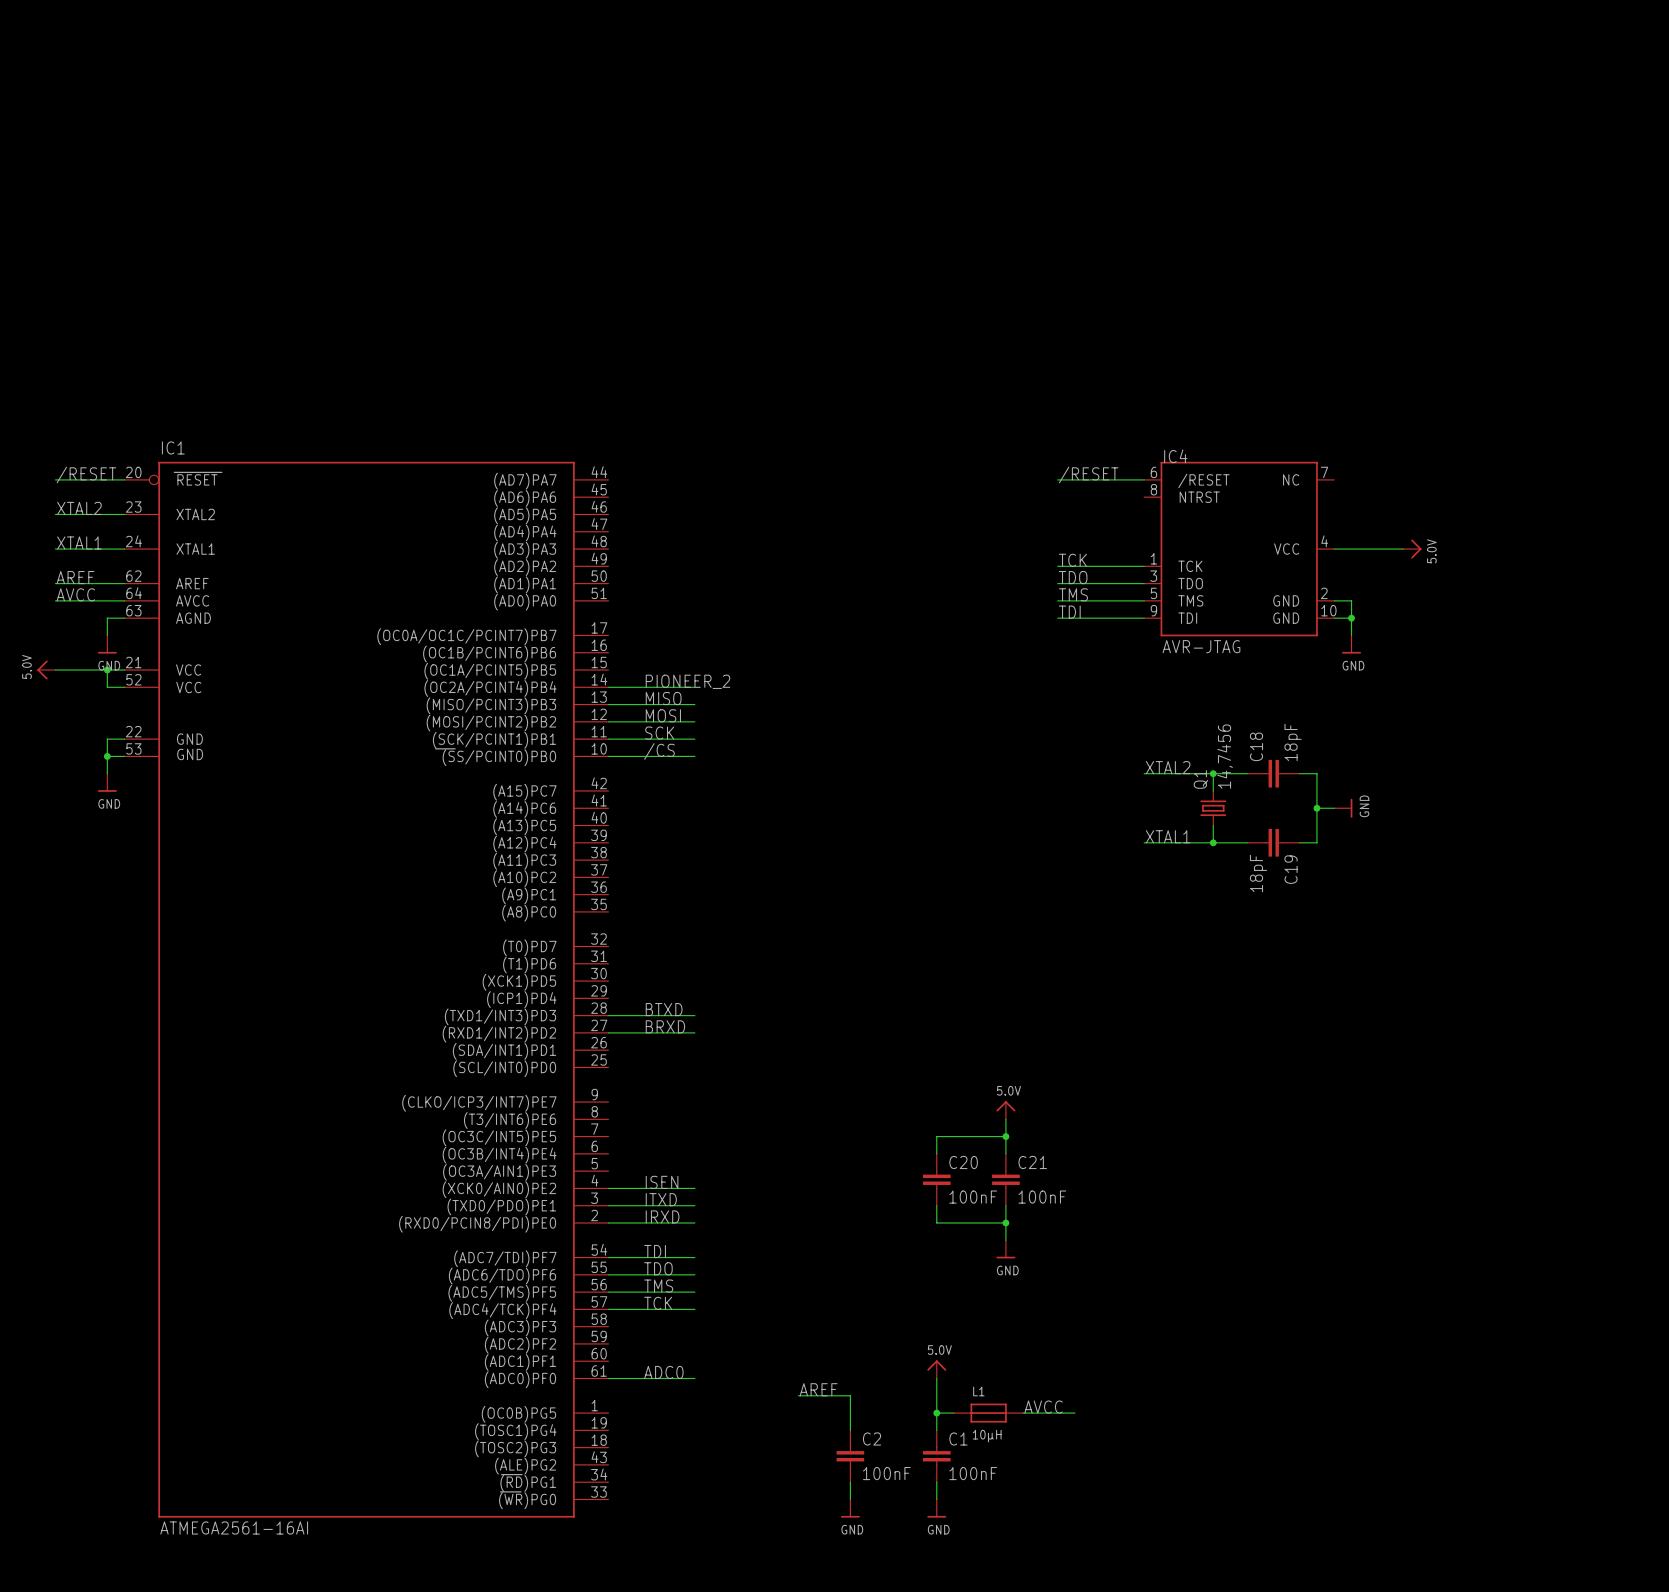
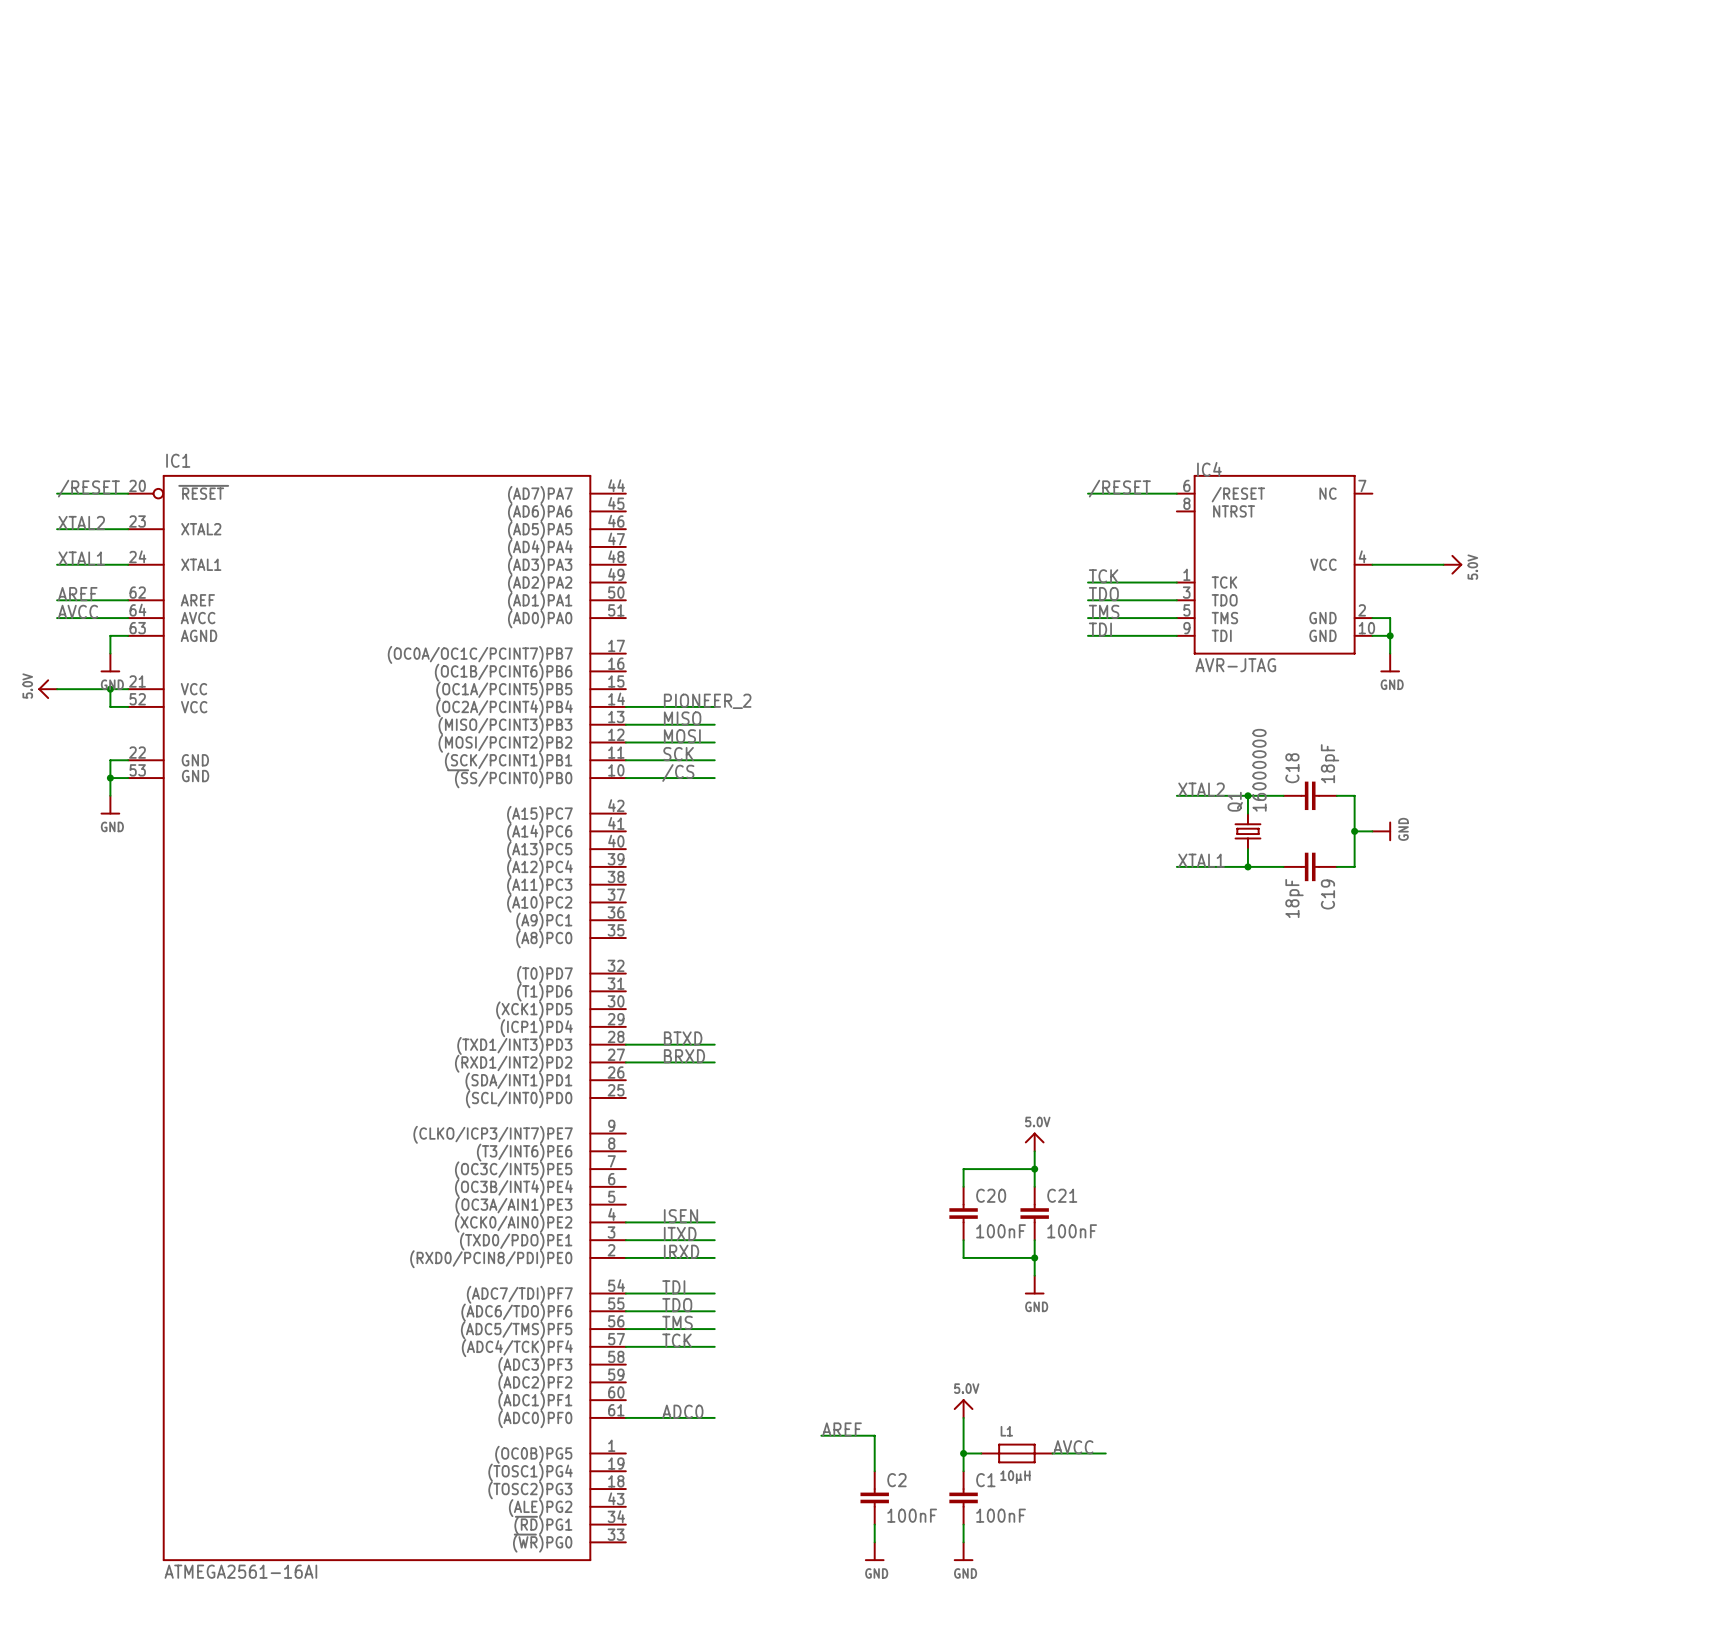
Q1 value: 14,7456 (1225, 756) -> 16000000 (1259, 770)

